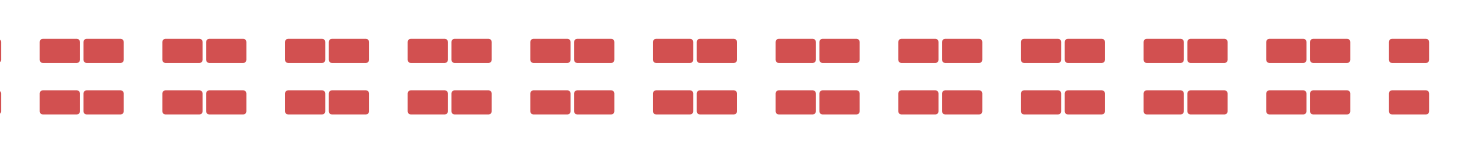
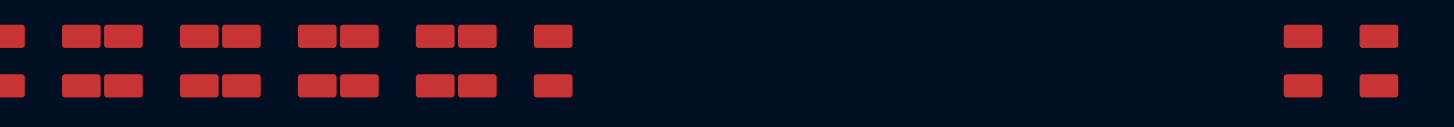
part: (633, 76) -> none
part: (756, 76) -> none
part: (878, 76) -> none
part: (1001, 76) -> none
part: (1124, 76) -> none
part: (1246, 76) -> none

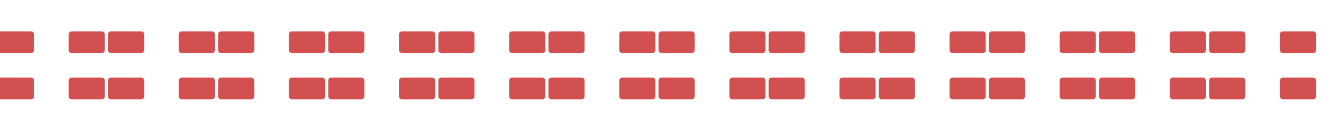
part: none -> (601, 65)
part: none -> (712, 65)
part: none -> (822, 65)
part: none -> (932, 65)
part: none -> (1042, 65)
part: none -> (1152, 65)

